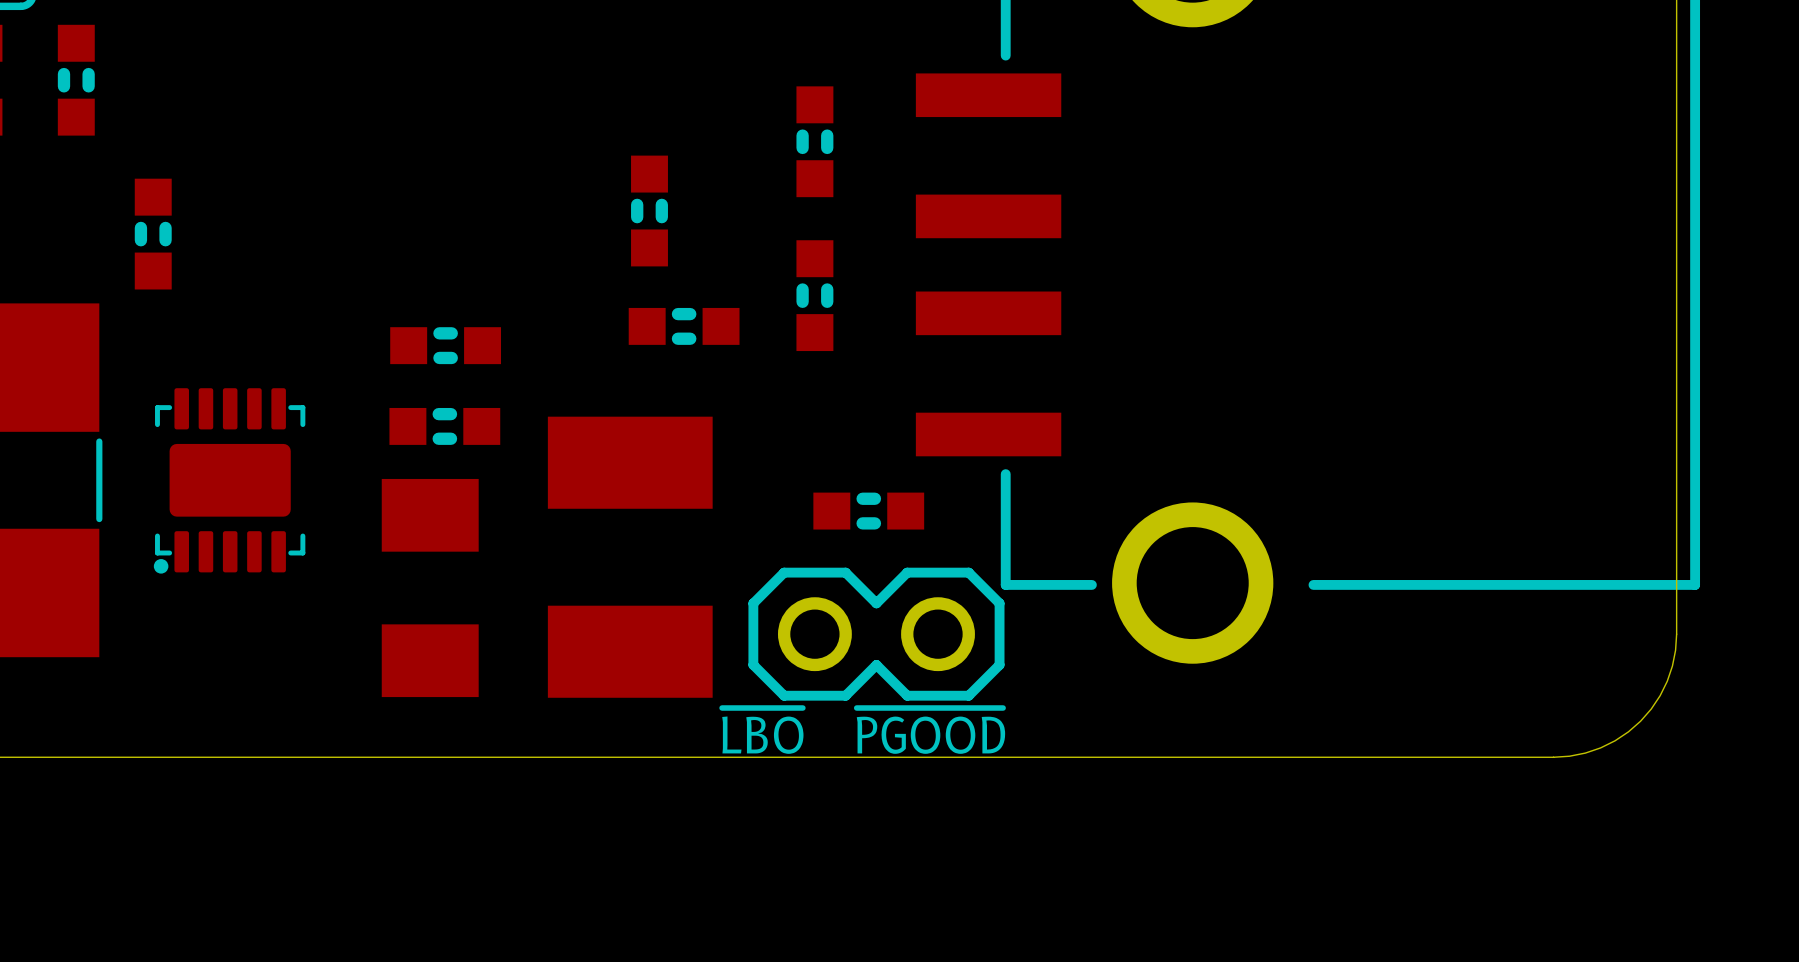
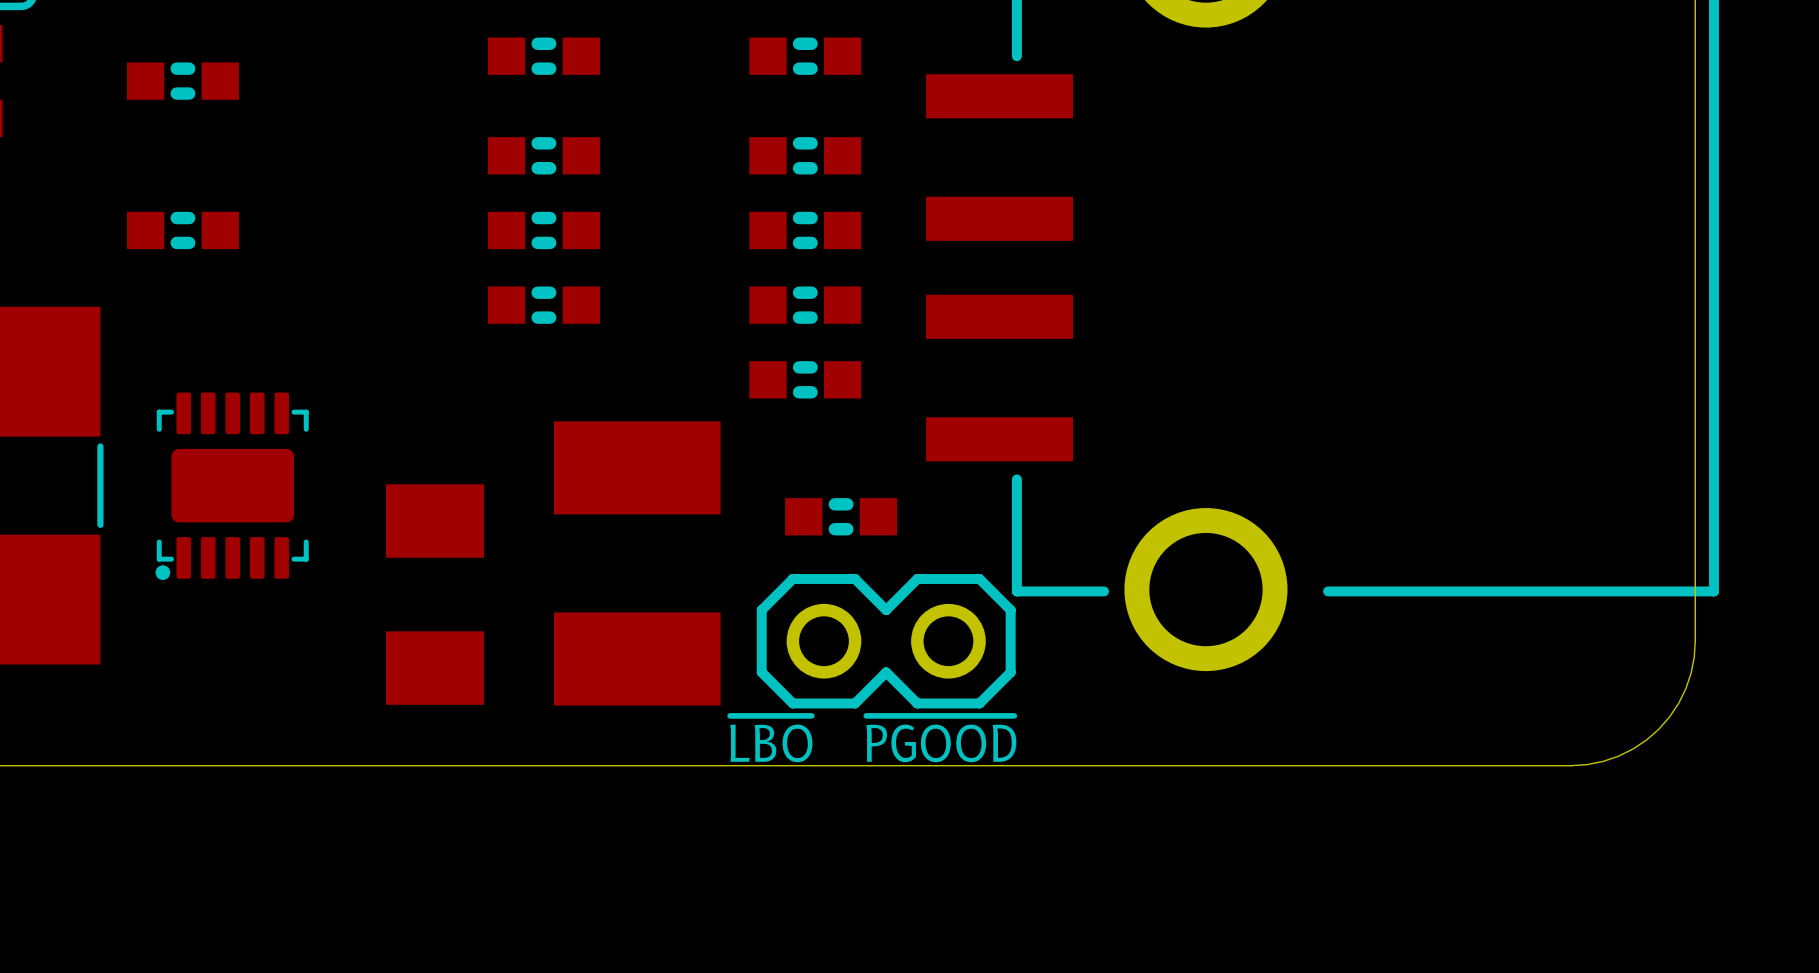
part: none -> (543, 56)
part: none -> (805, 56)
part: (76, 80) -> none
part: none -> (182, 81)
part rotation: 0° (814, 141) -> 90° clockwise (805, 155)
part: none -> (543, 155)
part: (649, 211) -> none
part: none -> (543, 230)
part: none -> (805, 230)
part rotation: 0° (153, 234) -> 90° clockwise (182, 230)
part rotation: 0° (814, 295) -> 90° clockwise (805, 305)
part: none -> (543, 305)
part: (684, 326) -> none
part: (445, 345) -> none
part: none -> (805, 379)
part: (444, 426) -> none
part position: (868, 511) -> (841, 516)

